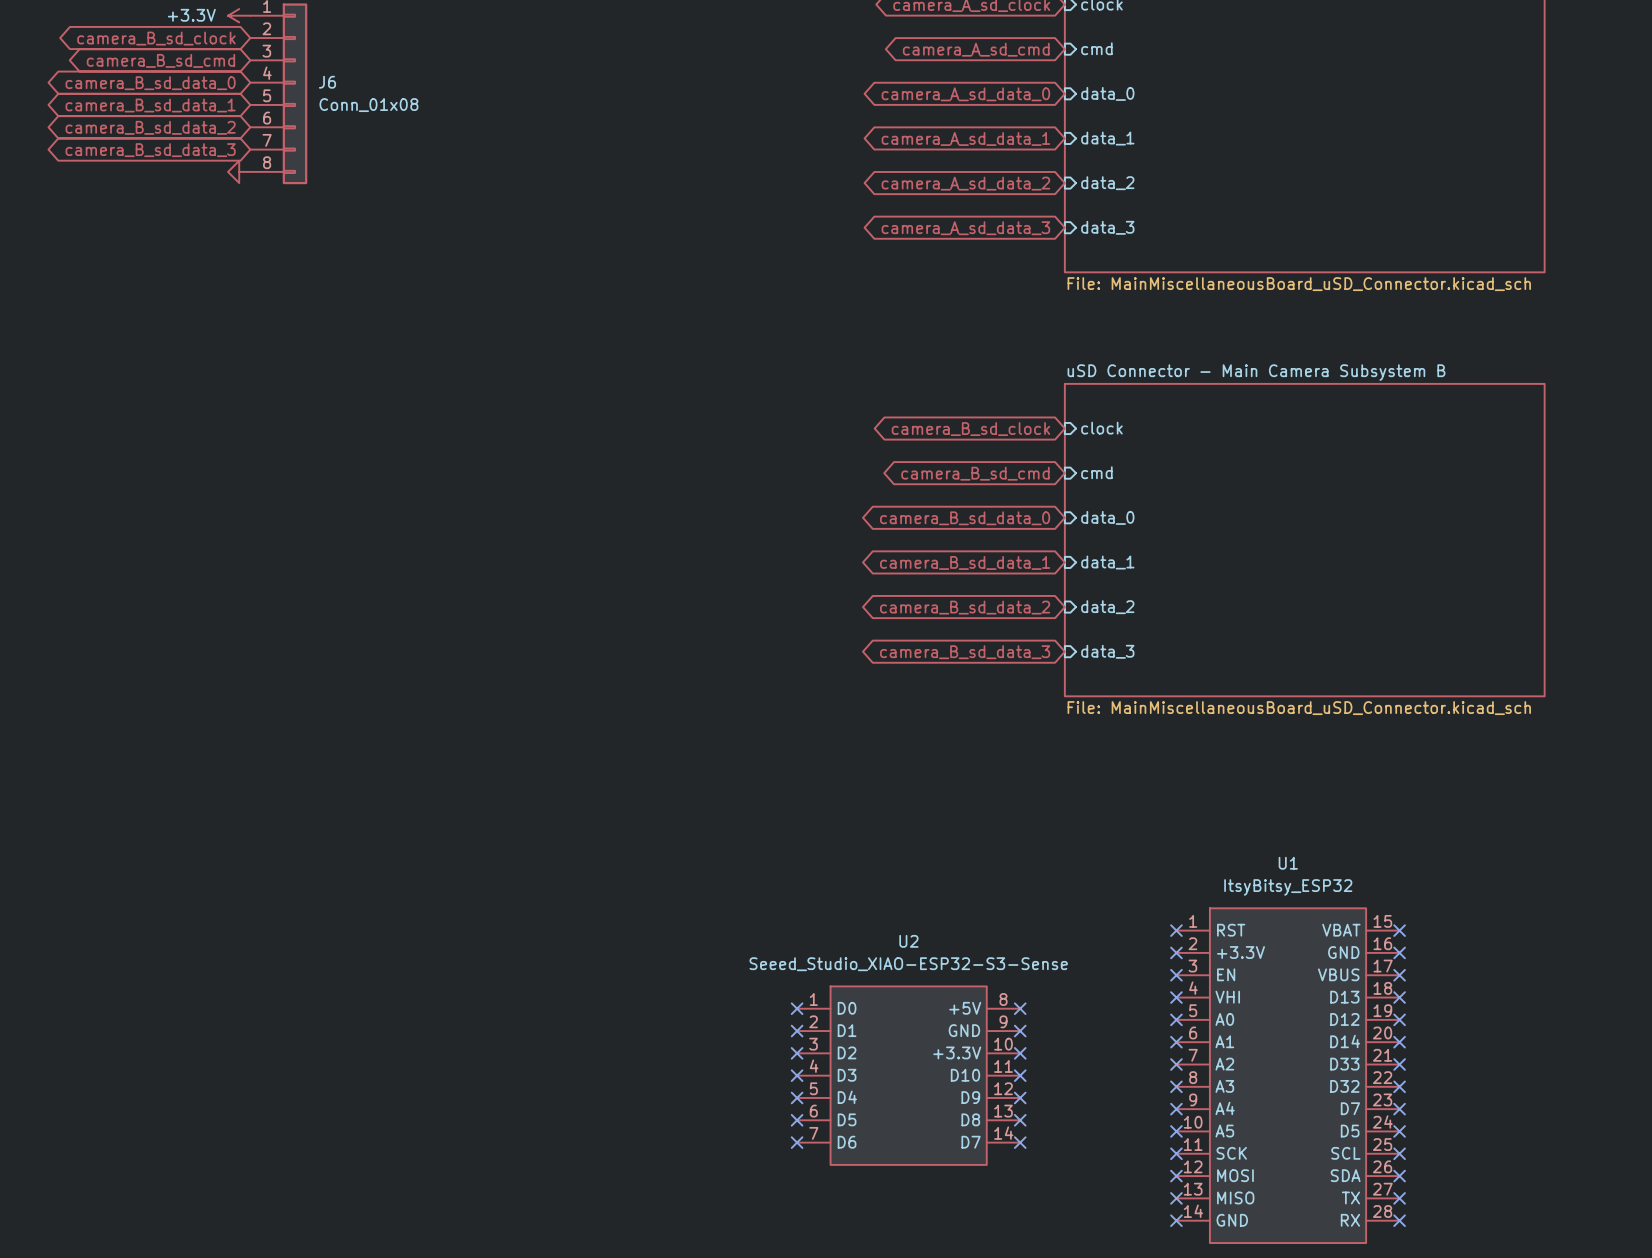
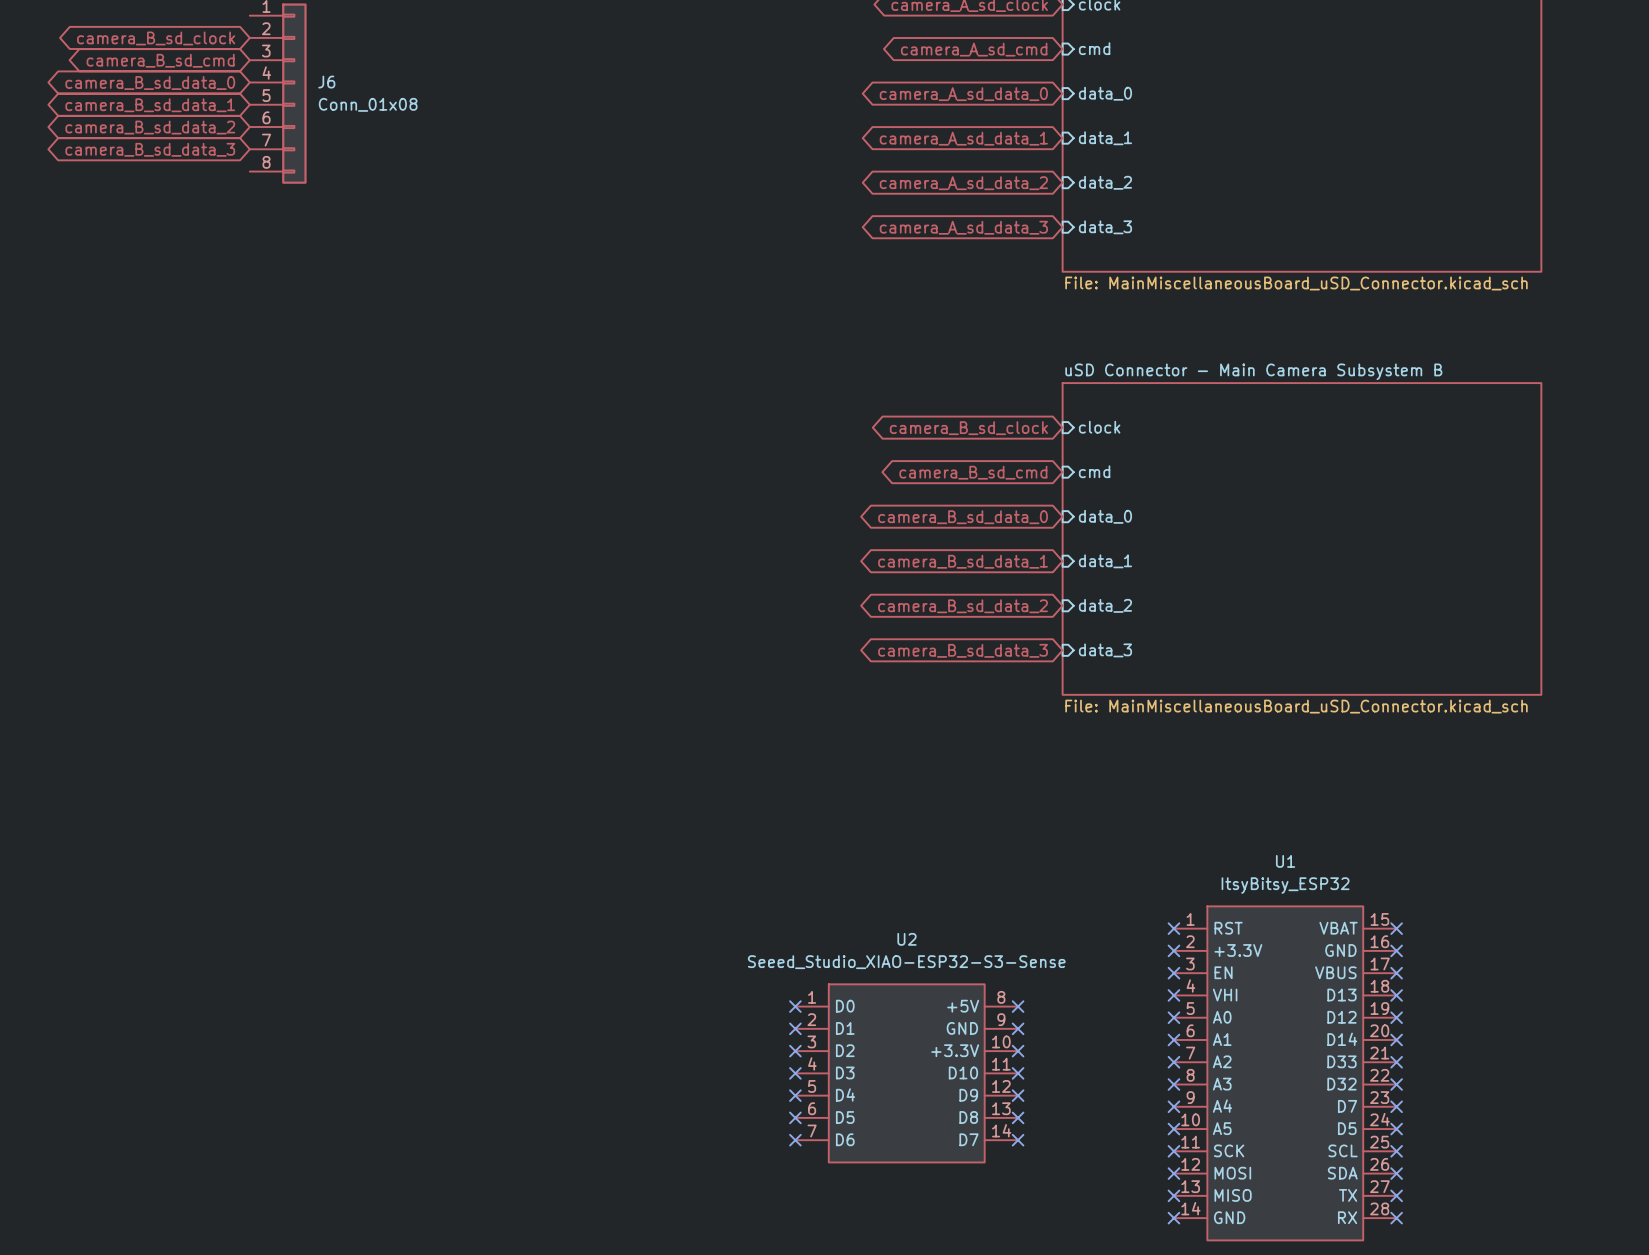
power symbol: +3.3V (239, 15) -> none
power symbol: (239, 171) -> none

